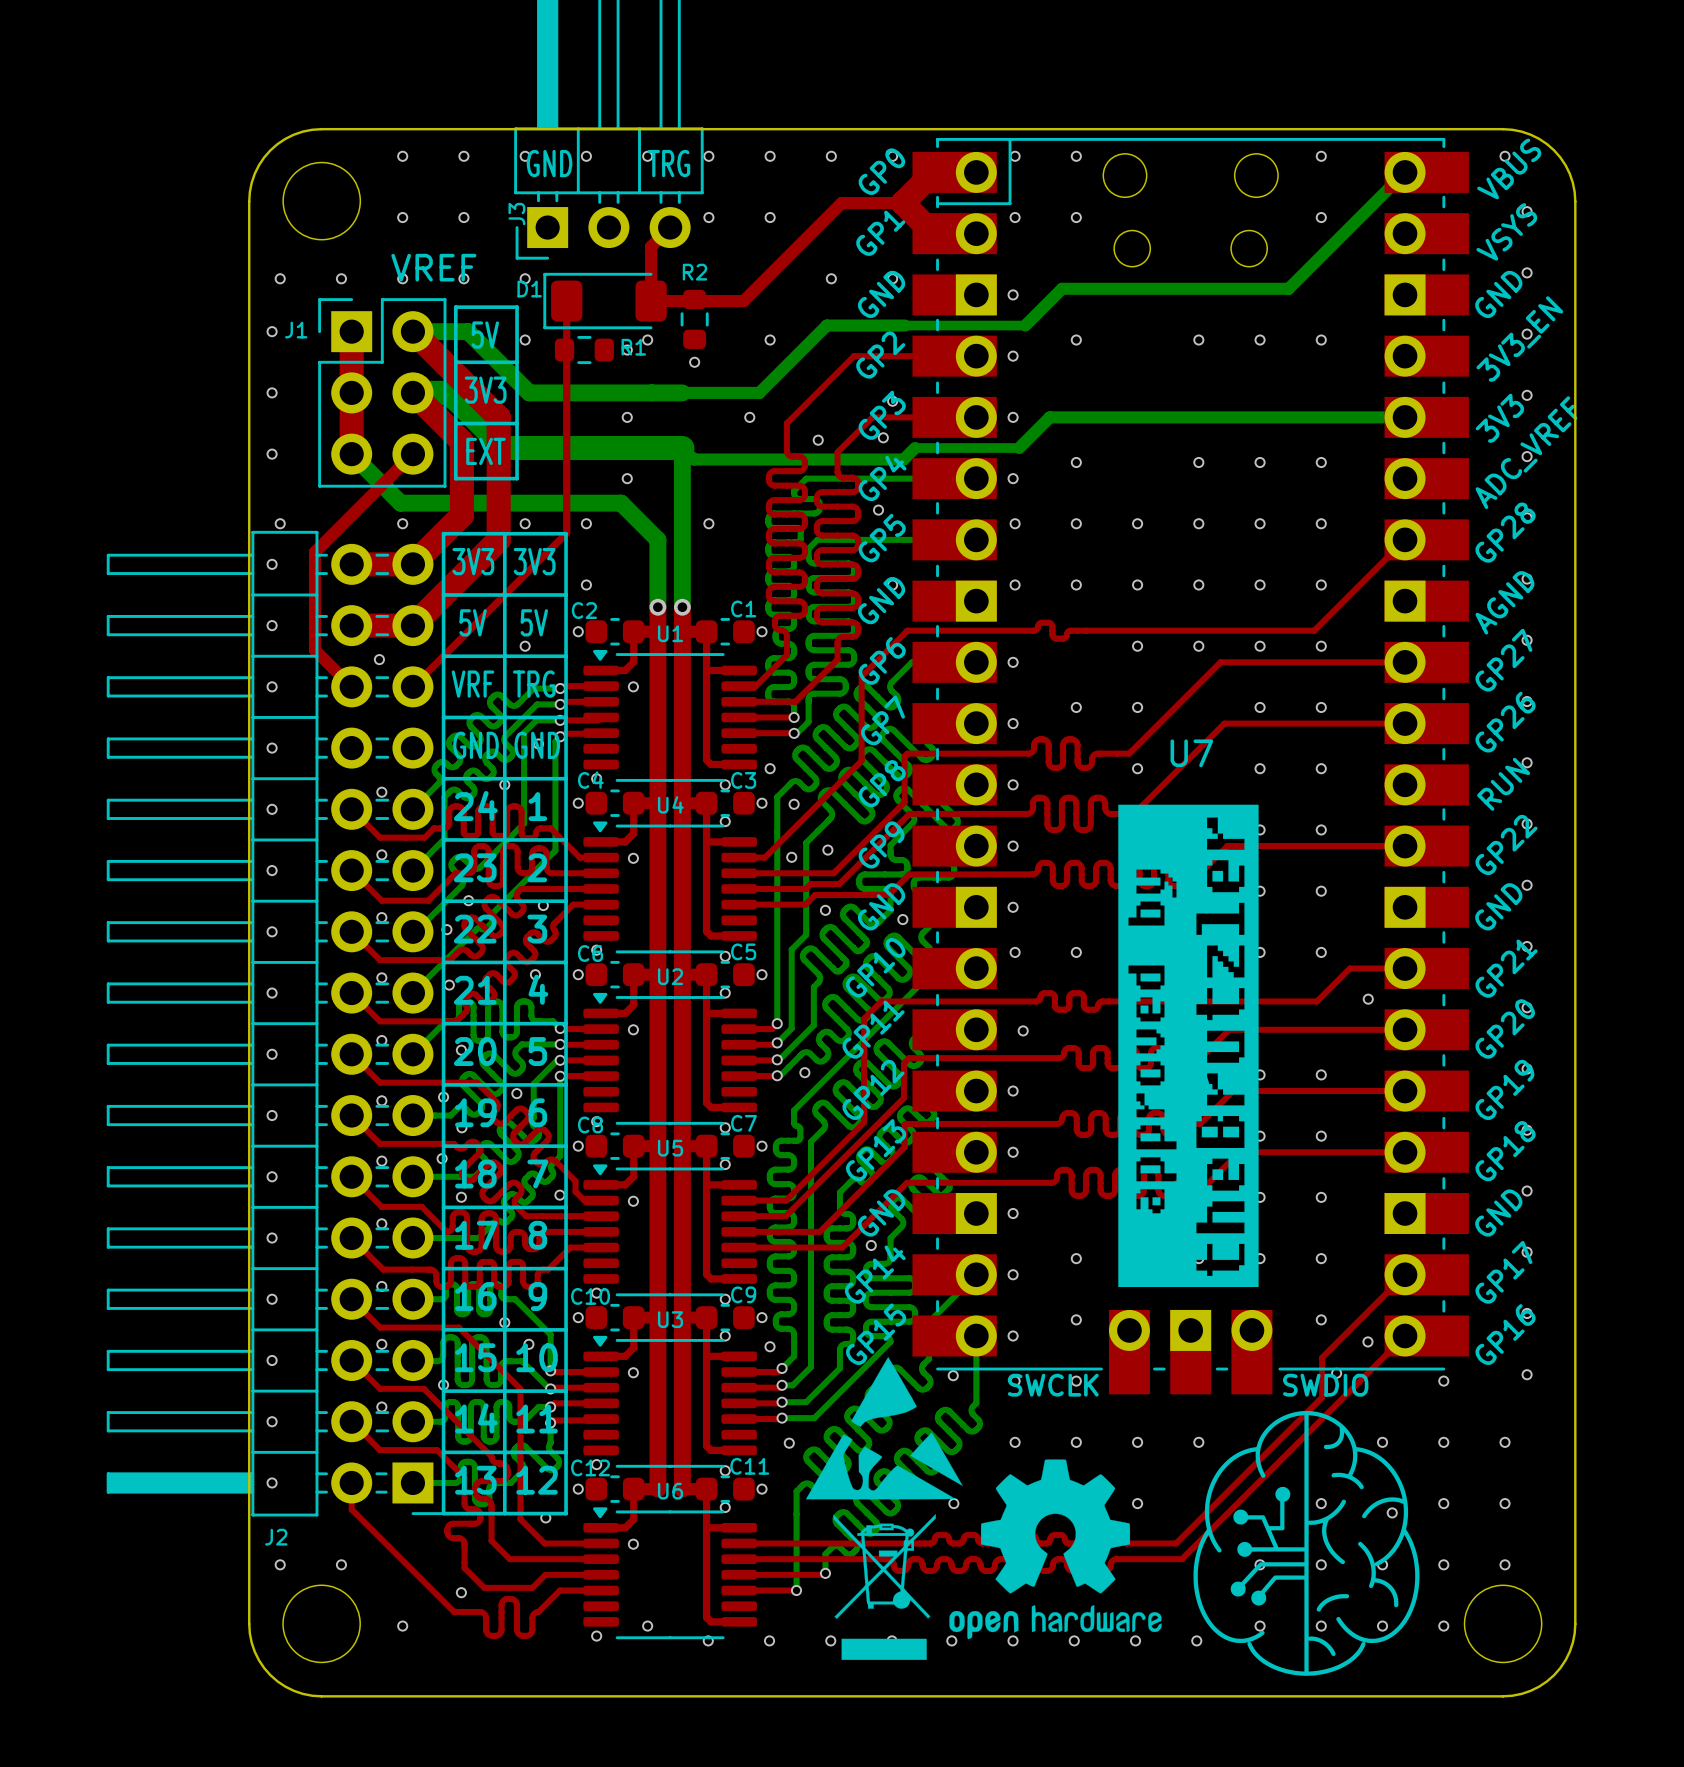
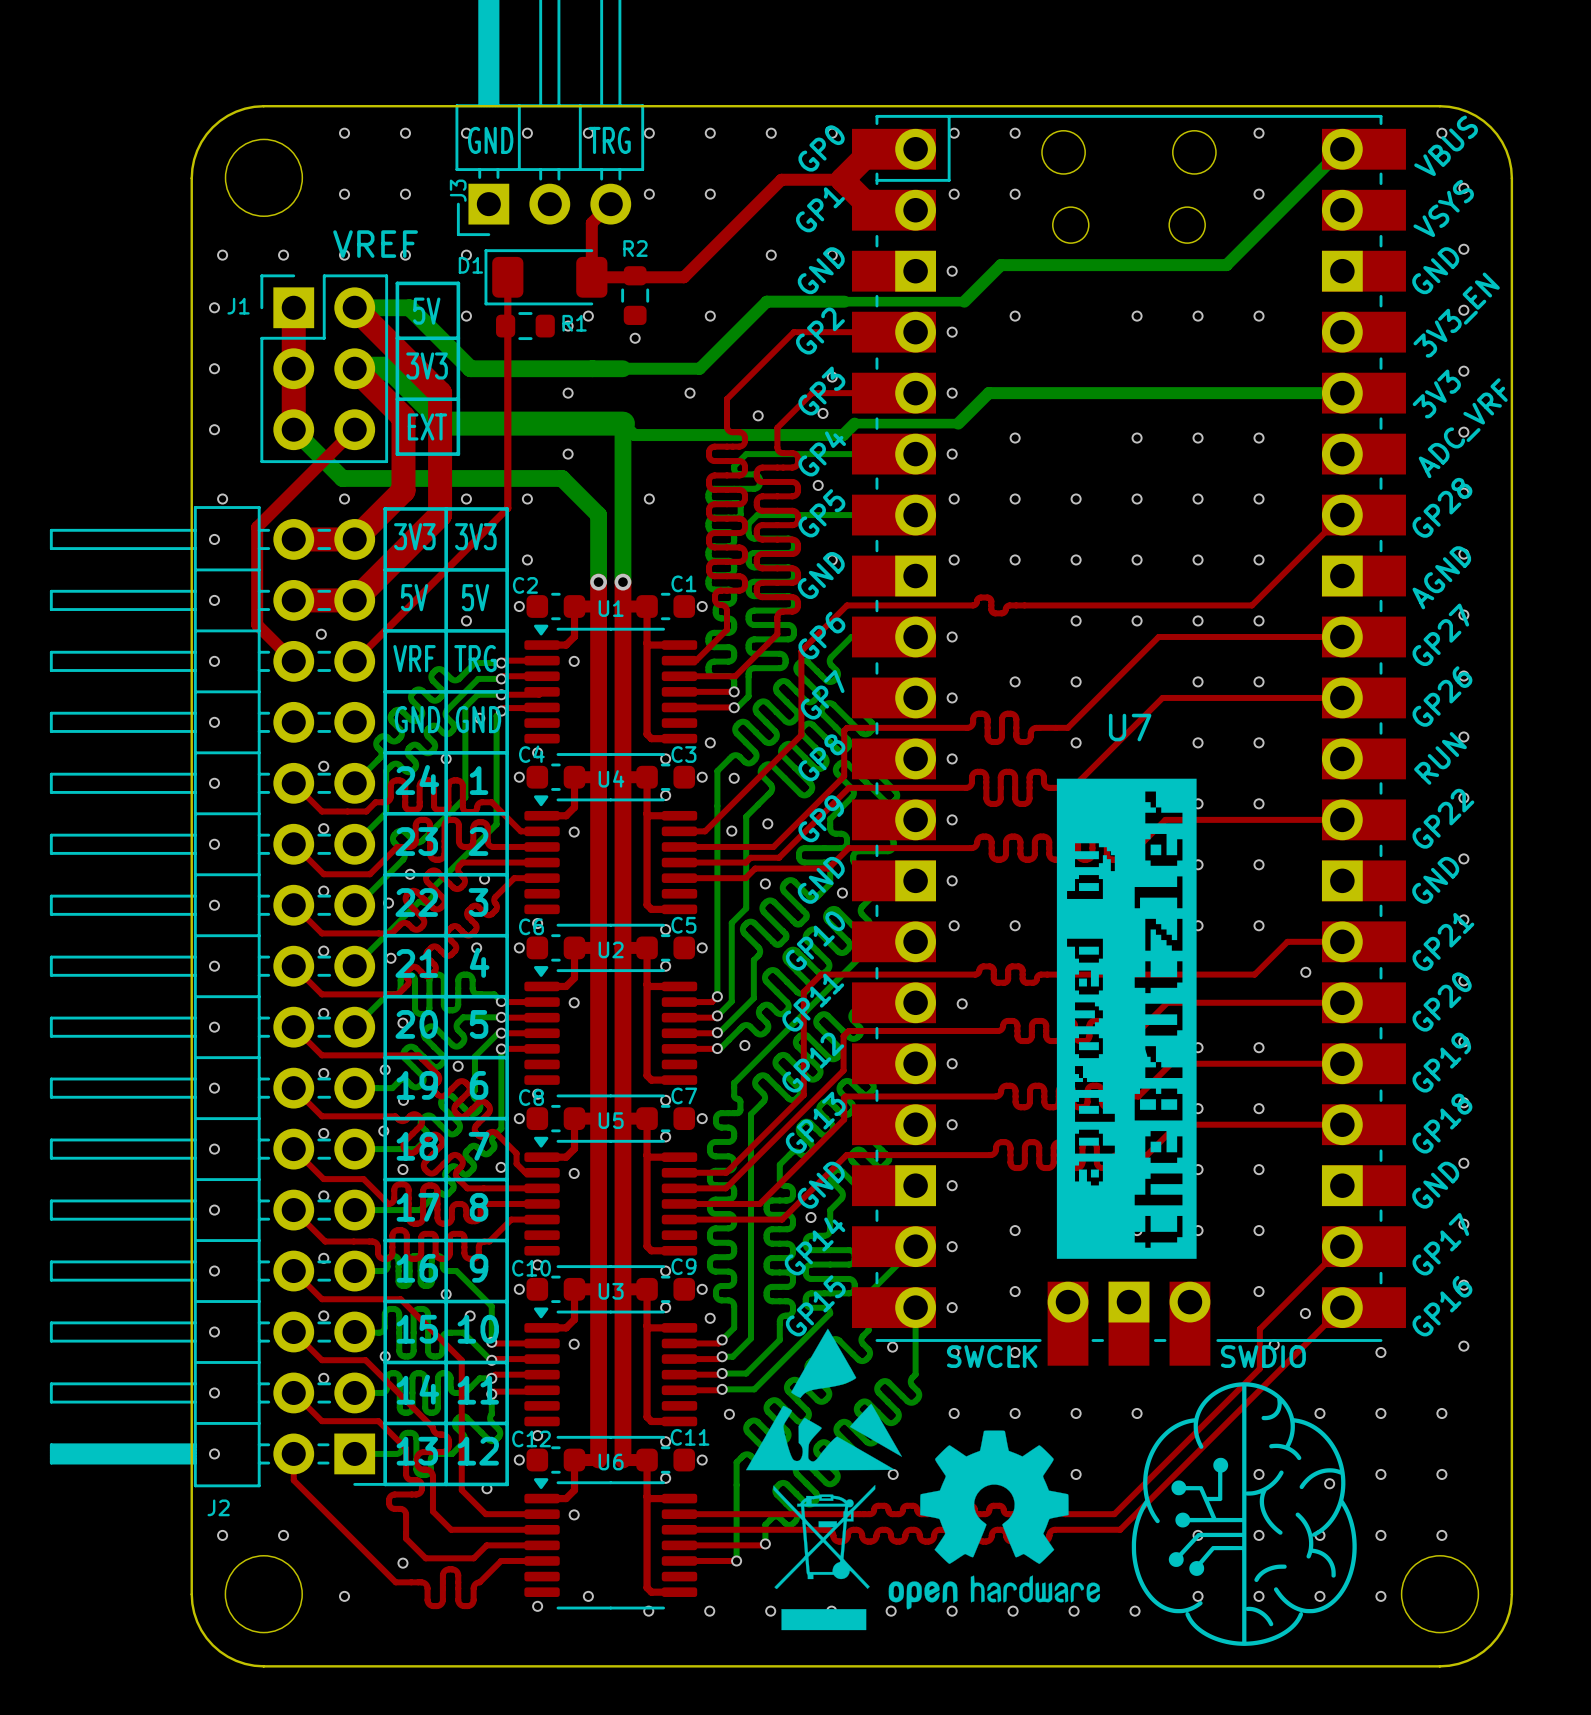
U7 text: ADC_VREF (1526, 452) -> ADC_VRF (1463, 428)

